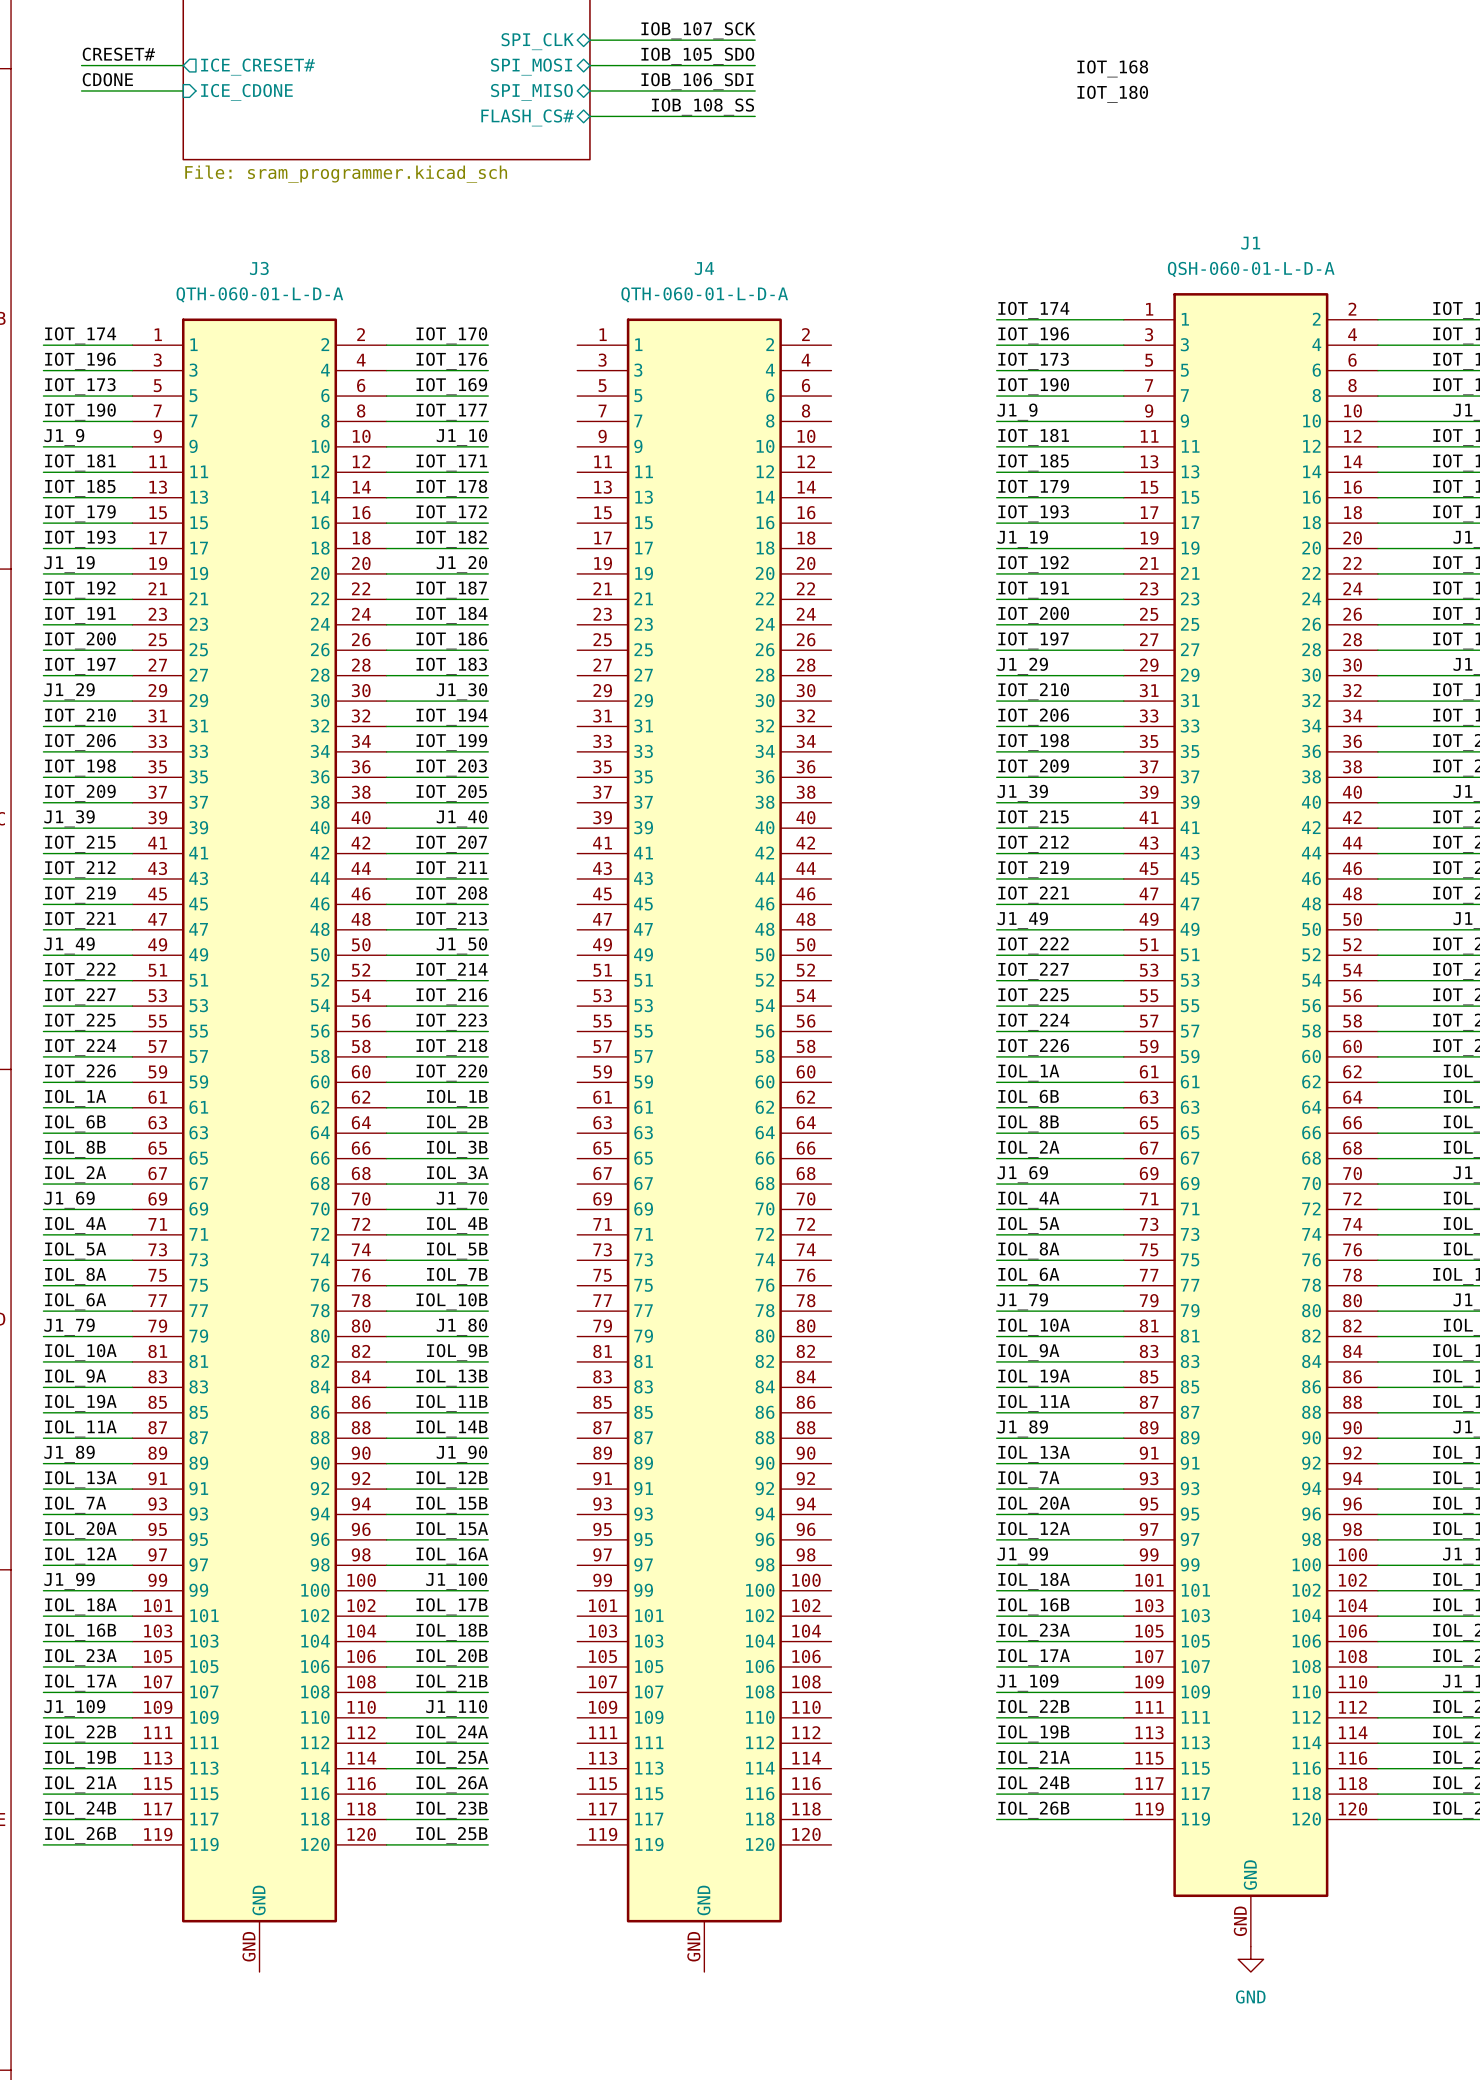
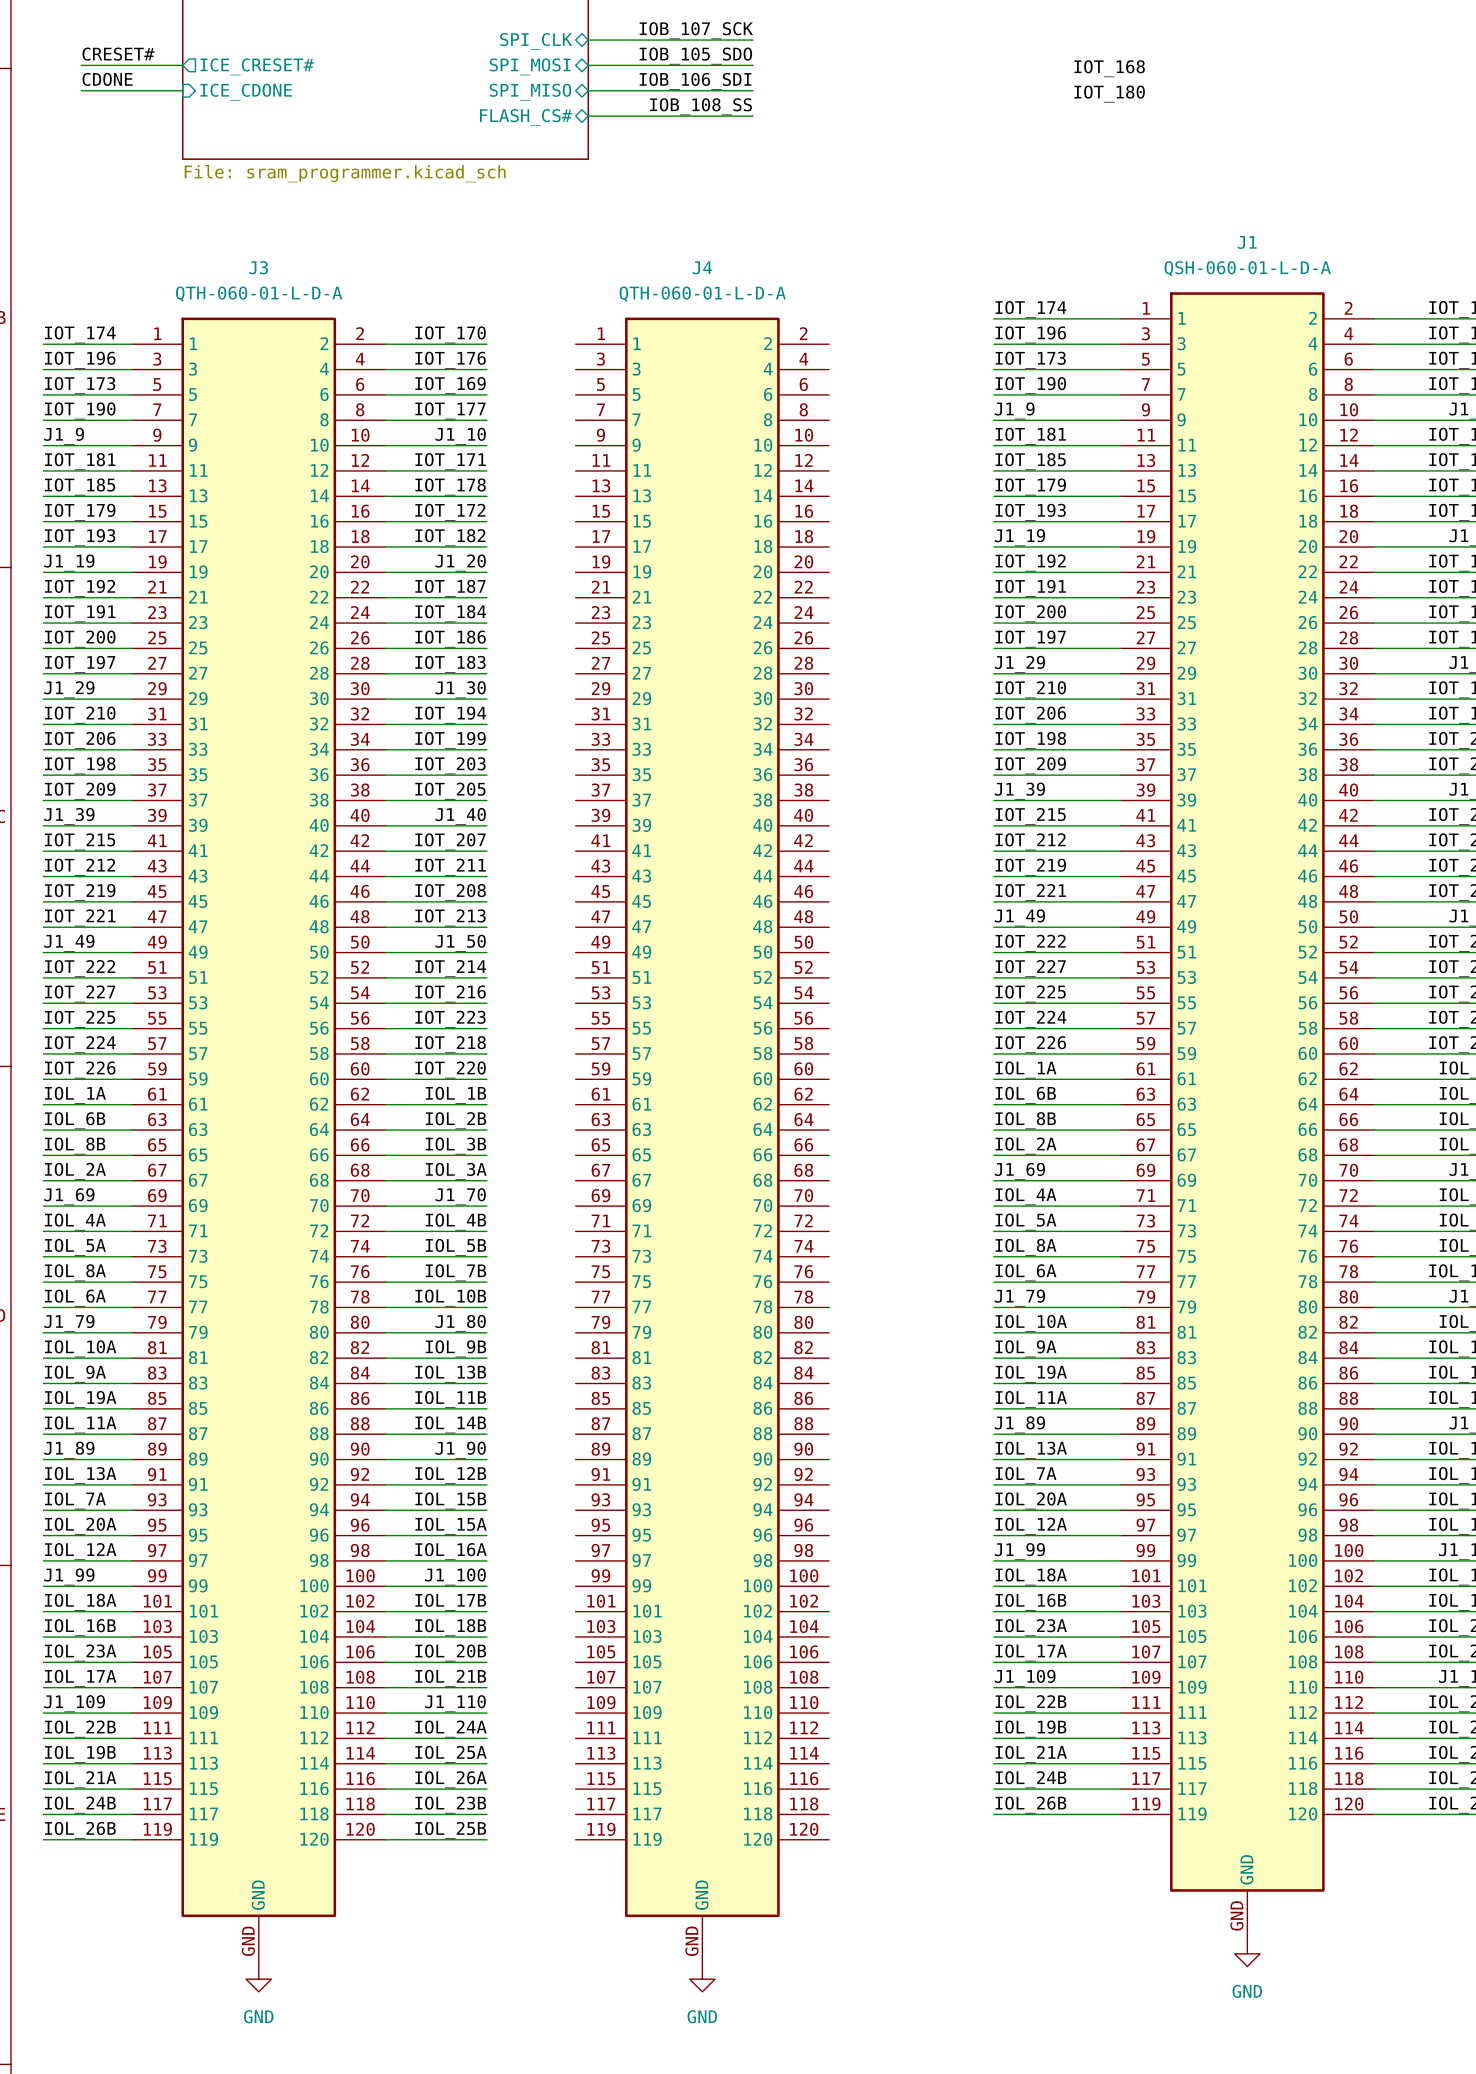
power symbol: none -> GND (258, 1979)
power symbol: none -> GND (702, 1979)

